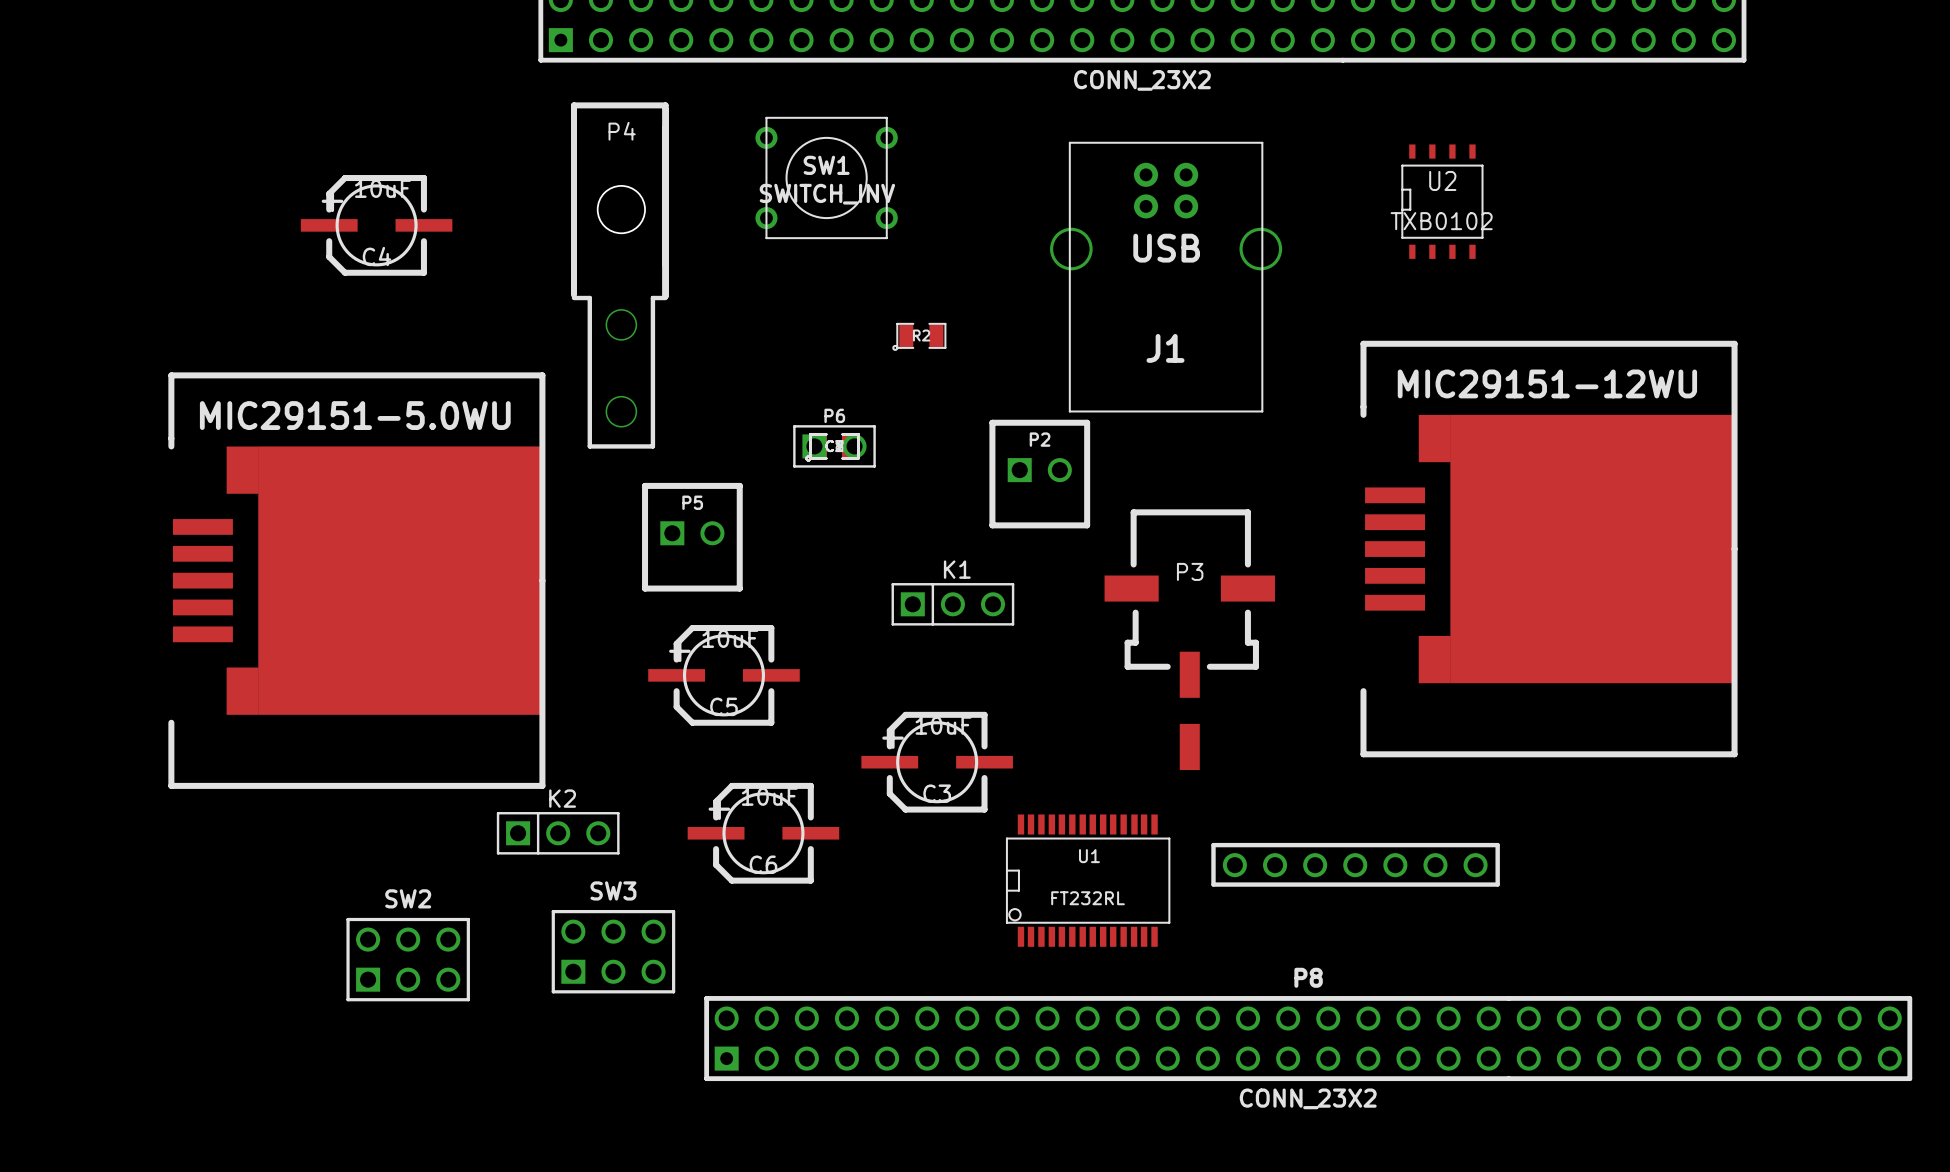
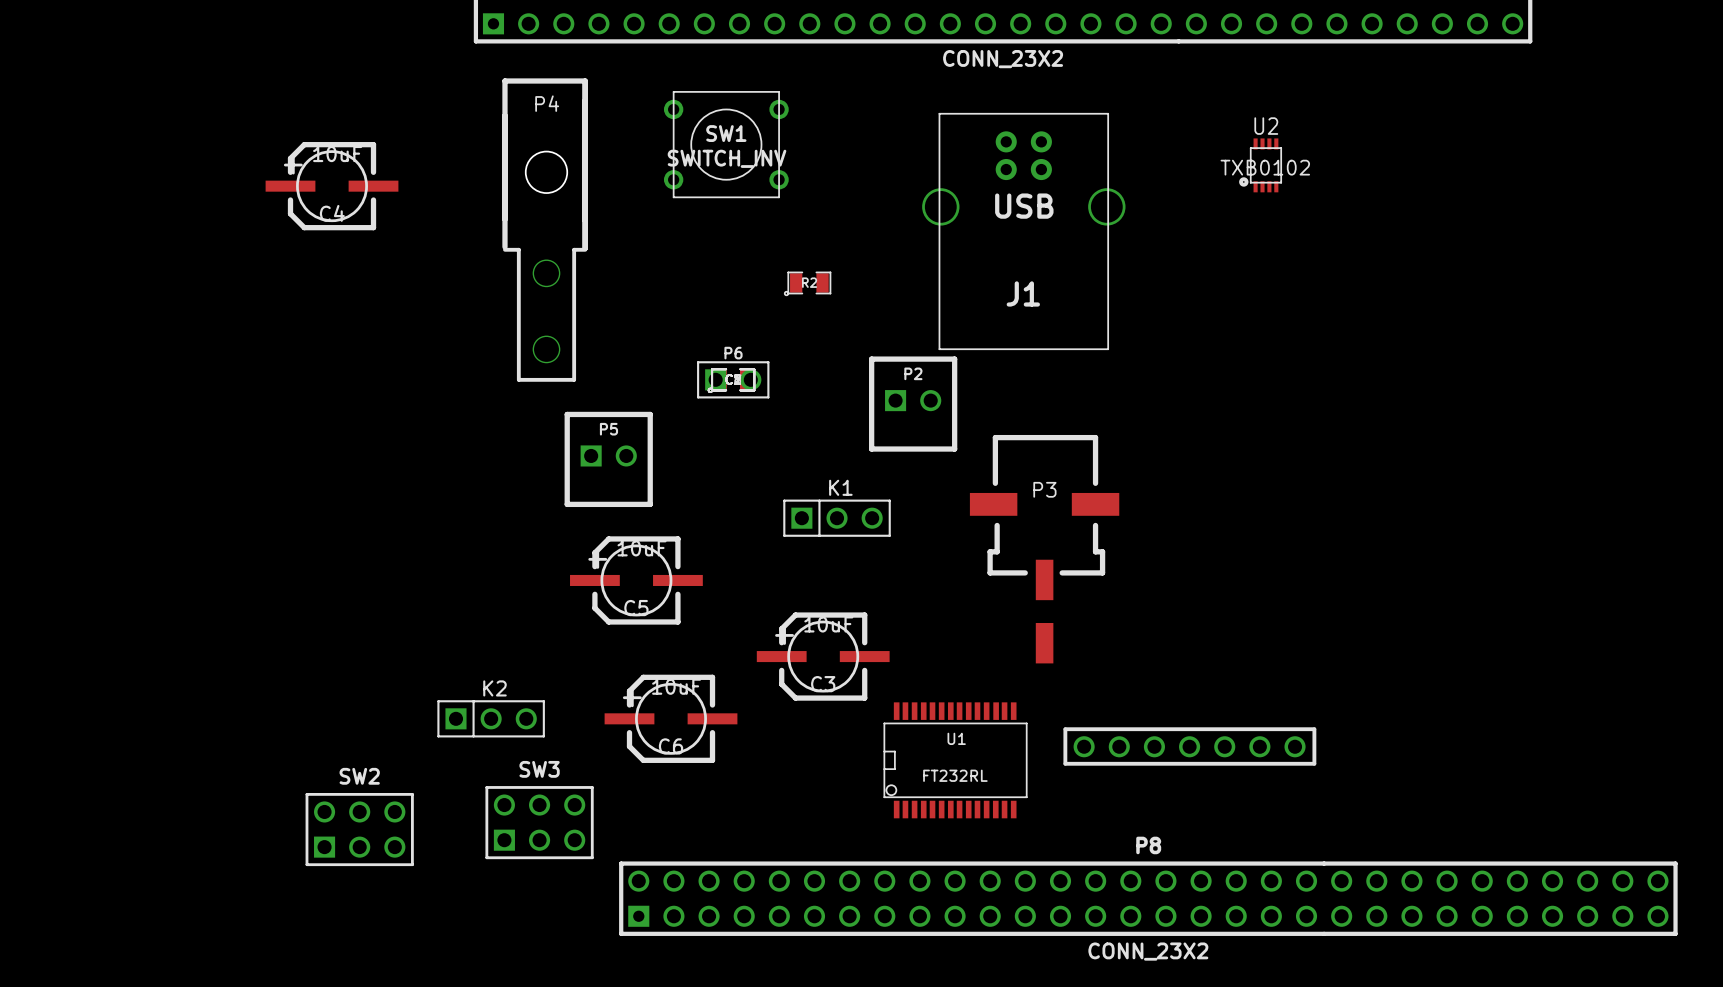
U2 footprint: [1401, 144, 1484, 259] -> [1239, 138, 1283, 193]
part: MIC29151-12WU (1549, 549) -> none
part: MIC29151-5.0WU (356, 580) -> none

